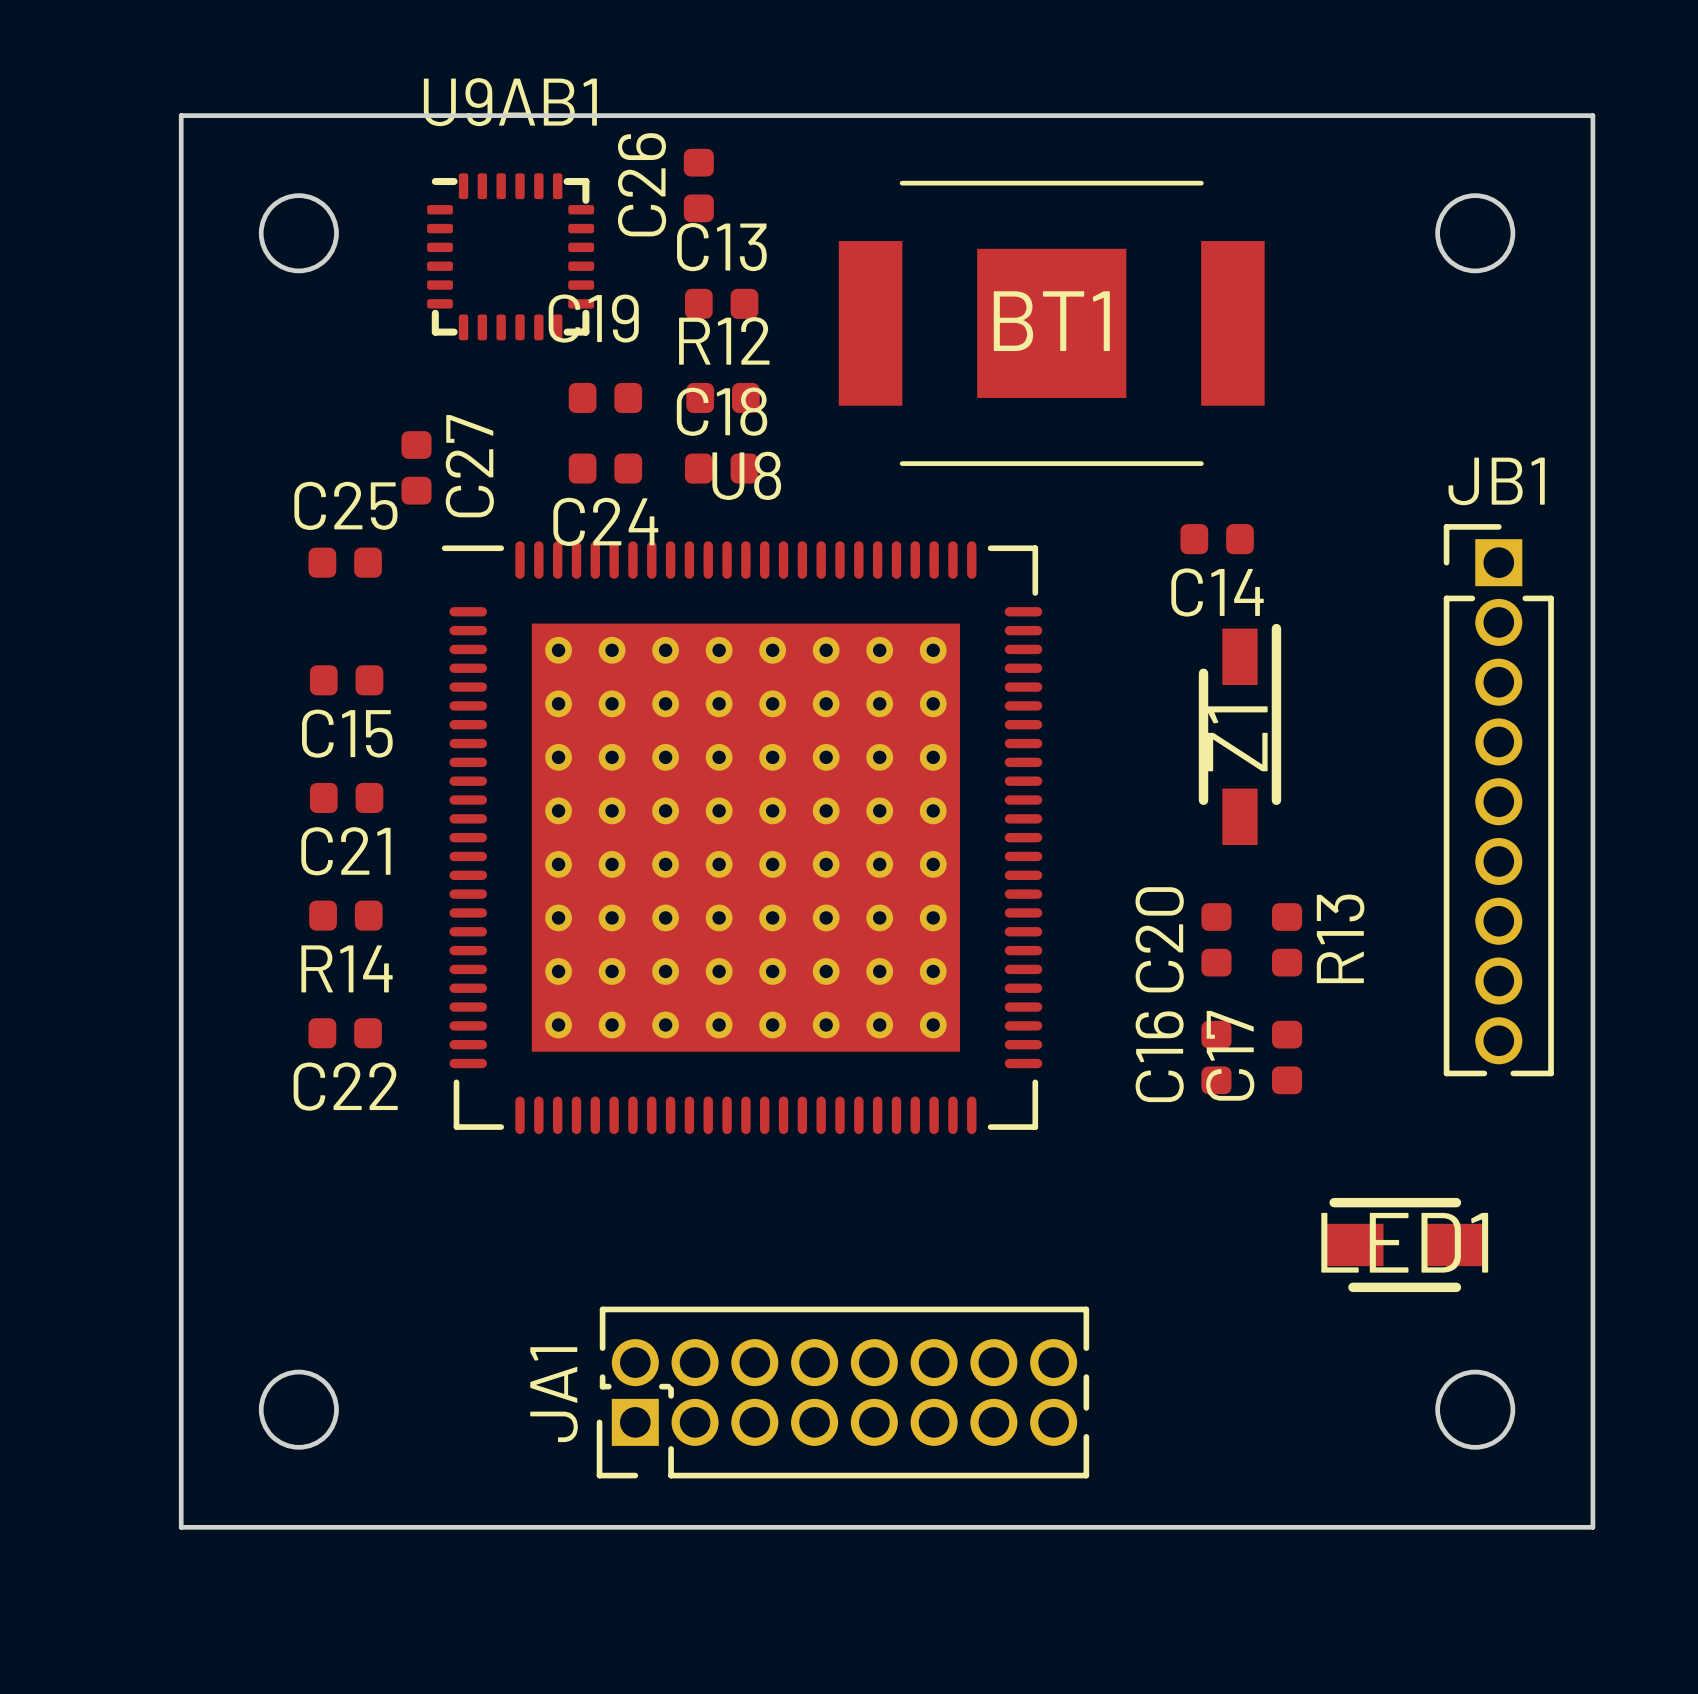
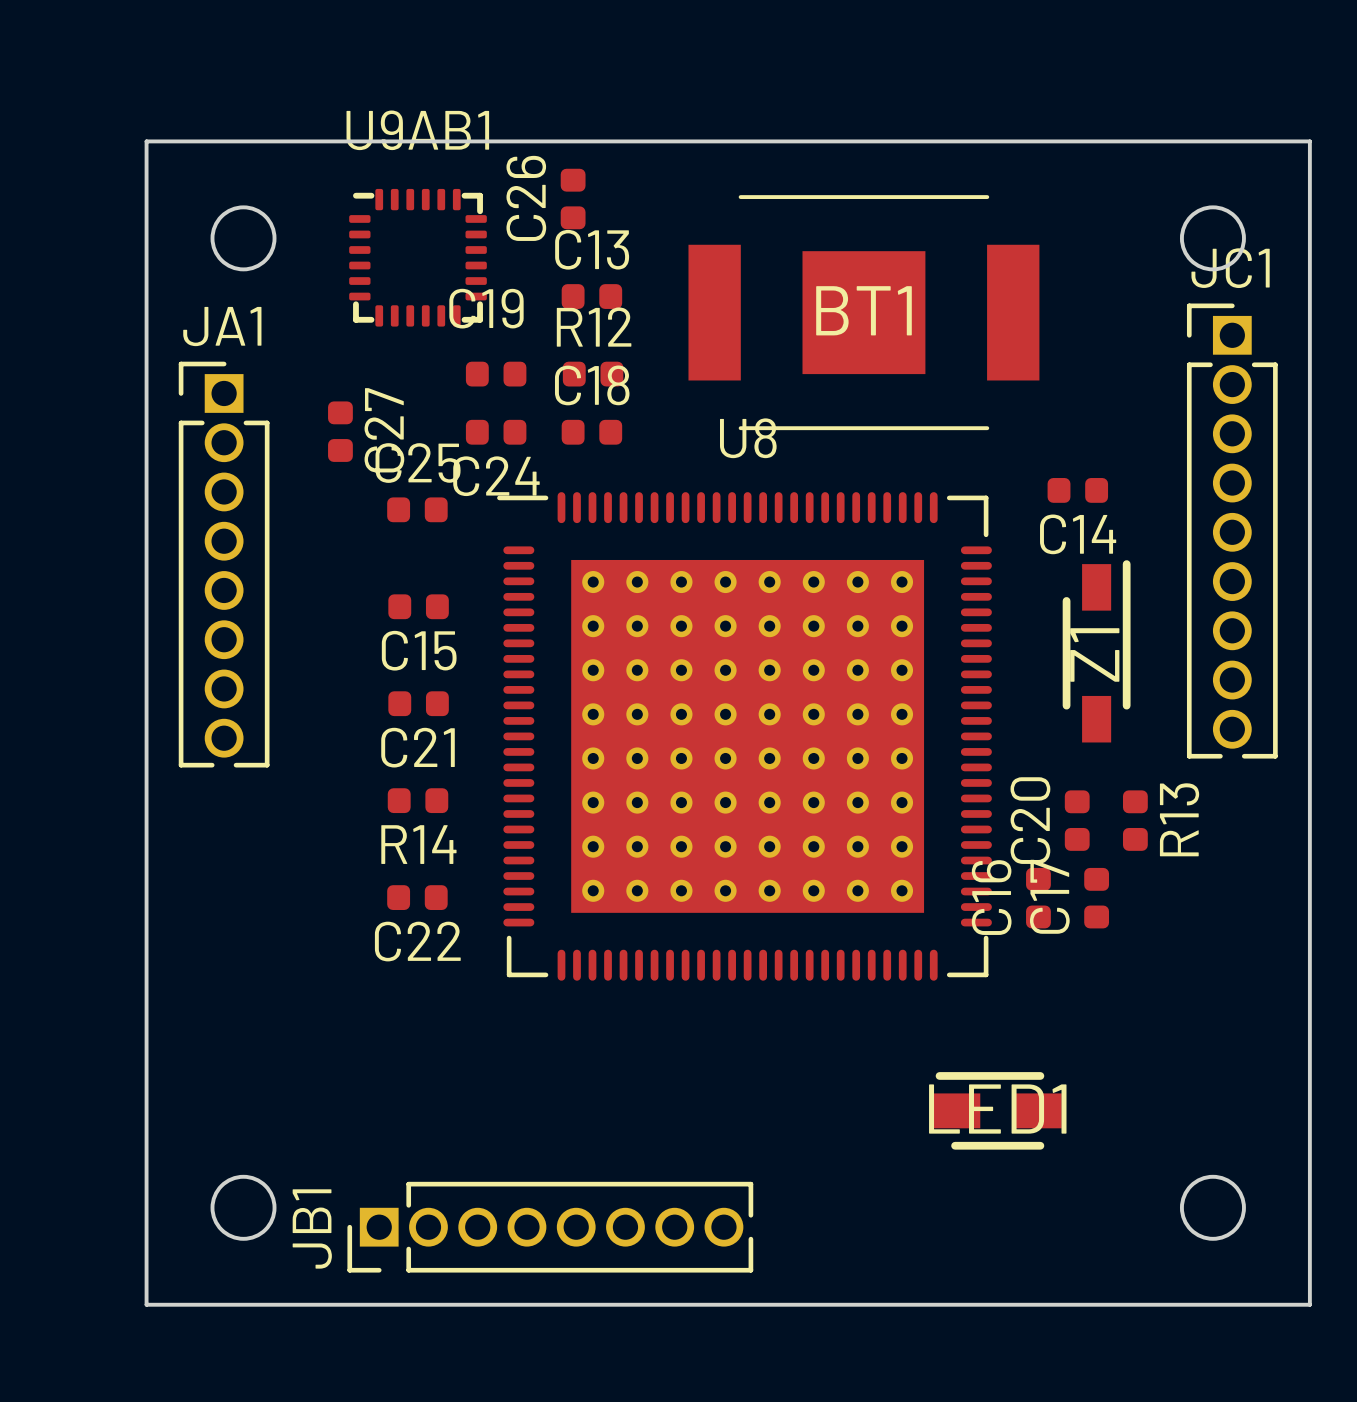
JB1 name position: JB1 (1496, 481) -> JB1 (312, 1228)
JB1 footprint: [1443, 524, 1554, 1077] -> [347, 1181, 754, 1273]
C14 position: (1217, 539) -> (1077, 490)
C25 position: (345, 562) -> (417, 509)
JC1: none -> (1232, 531)
C15 position: (346, 680) -> (418, 606)
Z1 position: (1239, 734) -> (1096, 651)
C21 position: (346, 797) -> (418, 703)
U8 position: (742, 837) -> (744, 736)
R14 position: (345, 915) -> (418, 800)
C20 position: (1216, 939) -> (1077, 820)
R13 position: (1287, 939) -> (1135, 820)
C22 position: (345, 1033) -> (417, 897)
C16 position: (1216, 1057) -> (1038, 898)
C17 position: (1287, 1057) -> (1096, 898)
LED1 position: (1404, 1244) -> (997, 1110)
JA1 footprint: [596, 1306, 1090, 1479] -> [178, 361, 270, 768]
JA1 name position: JA1 (554, 1394) -> JA1 (222, 326)

